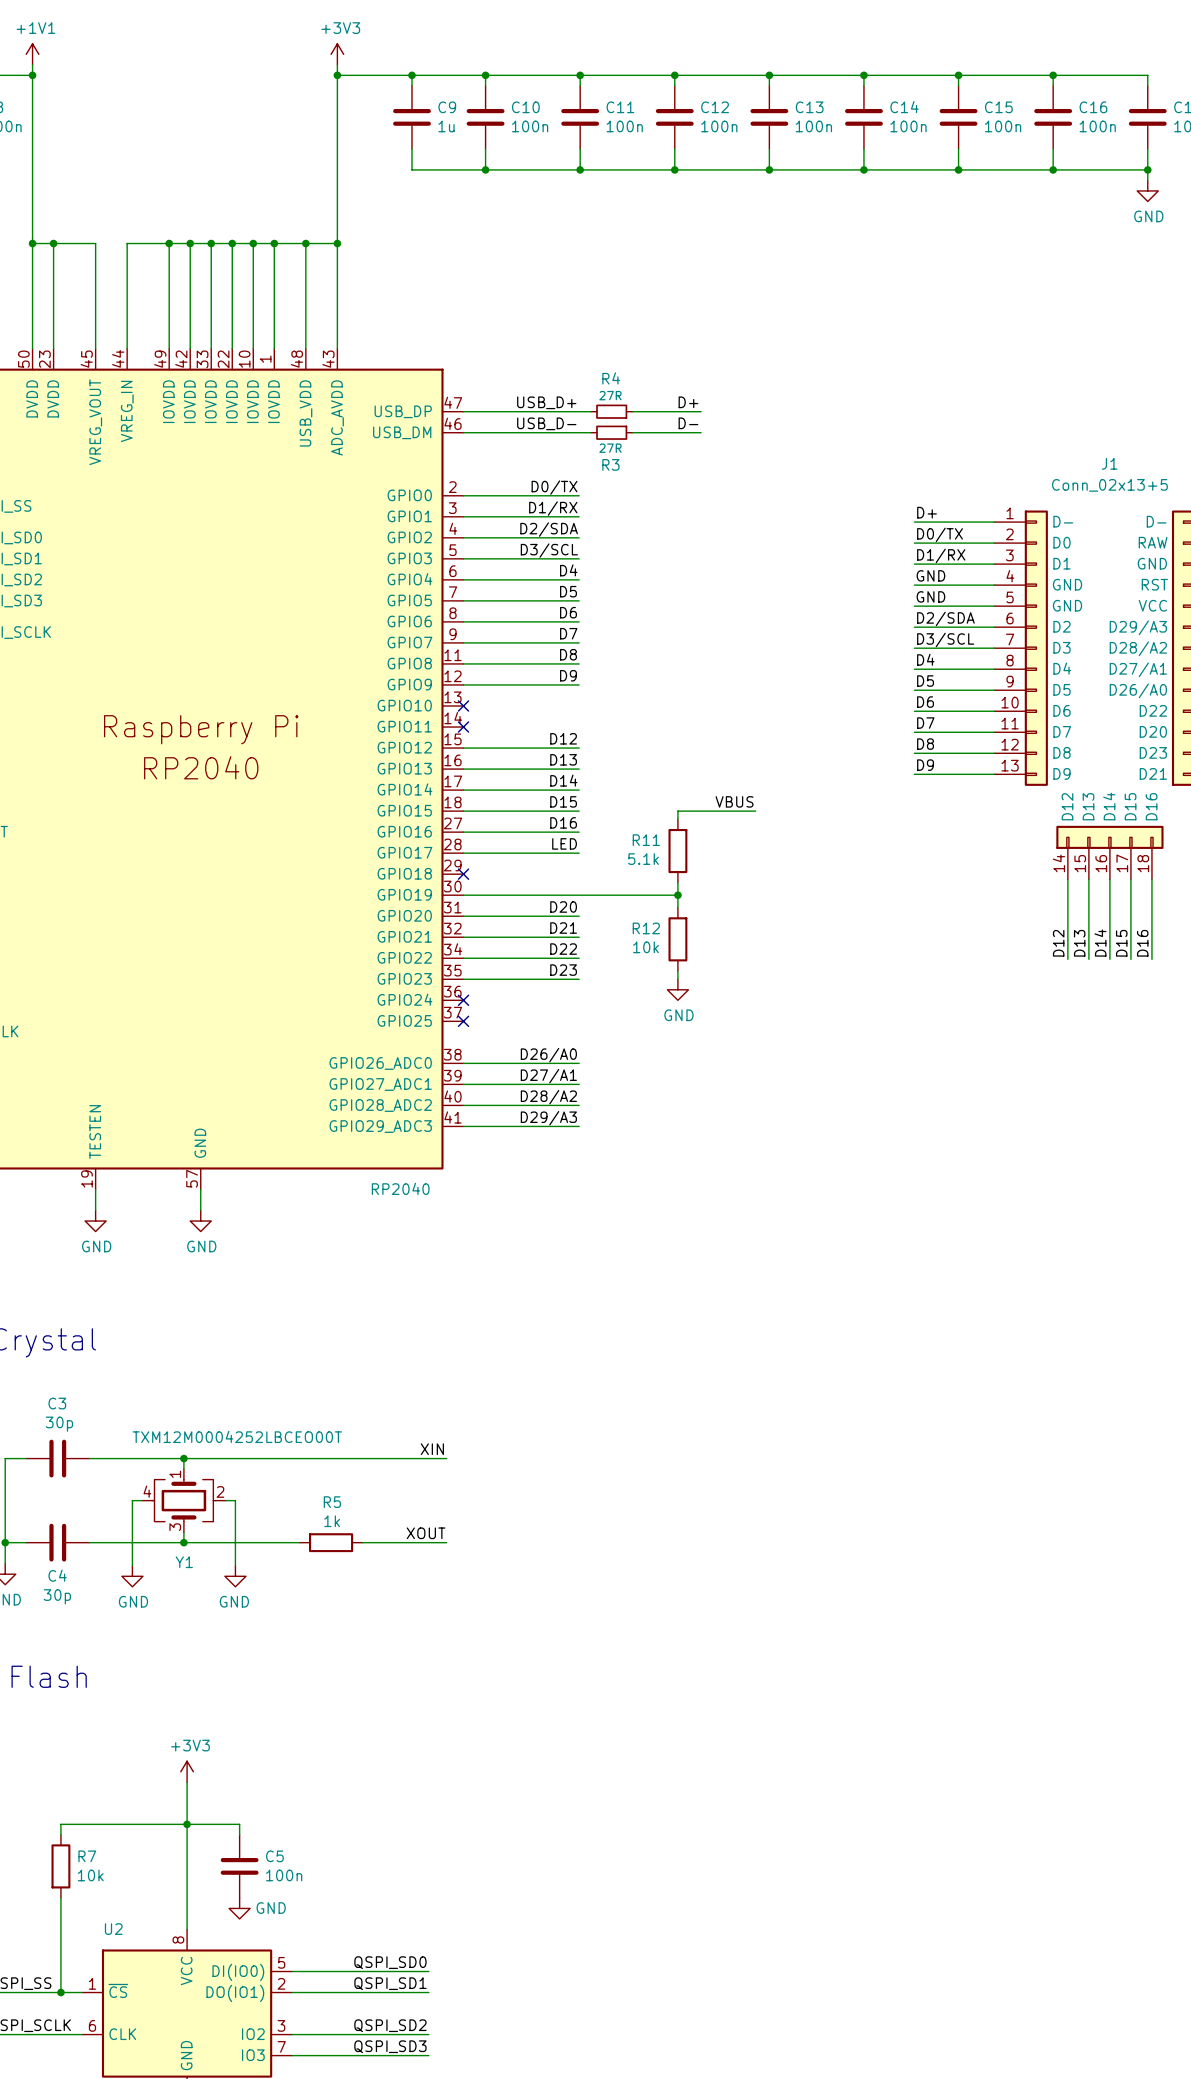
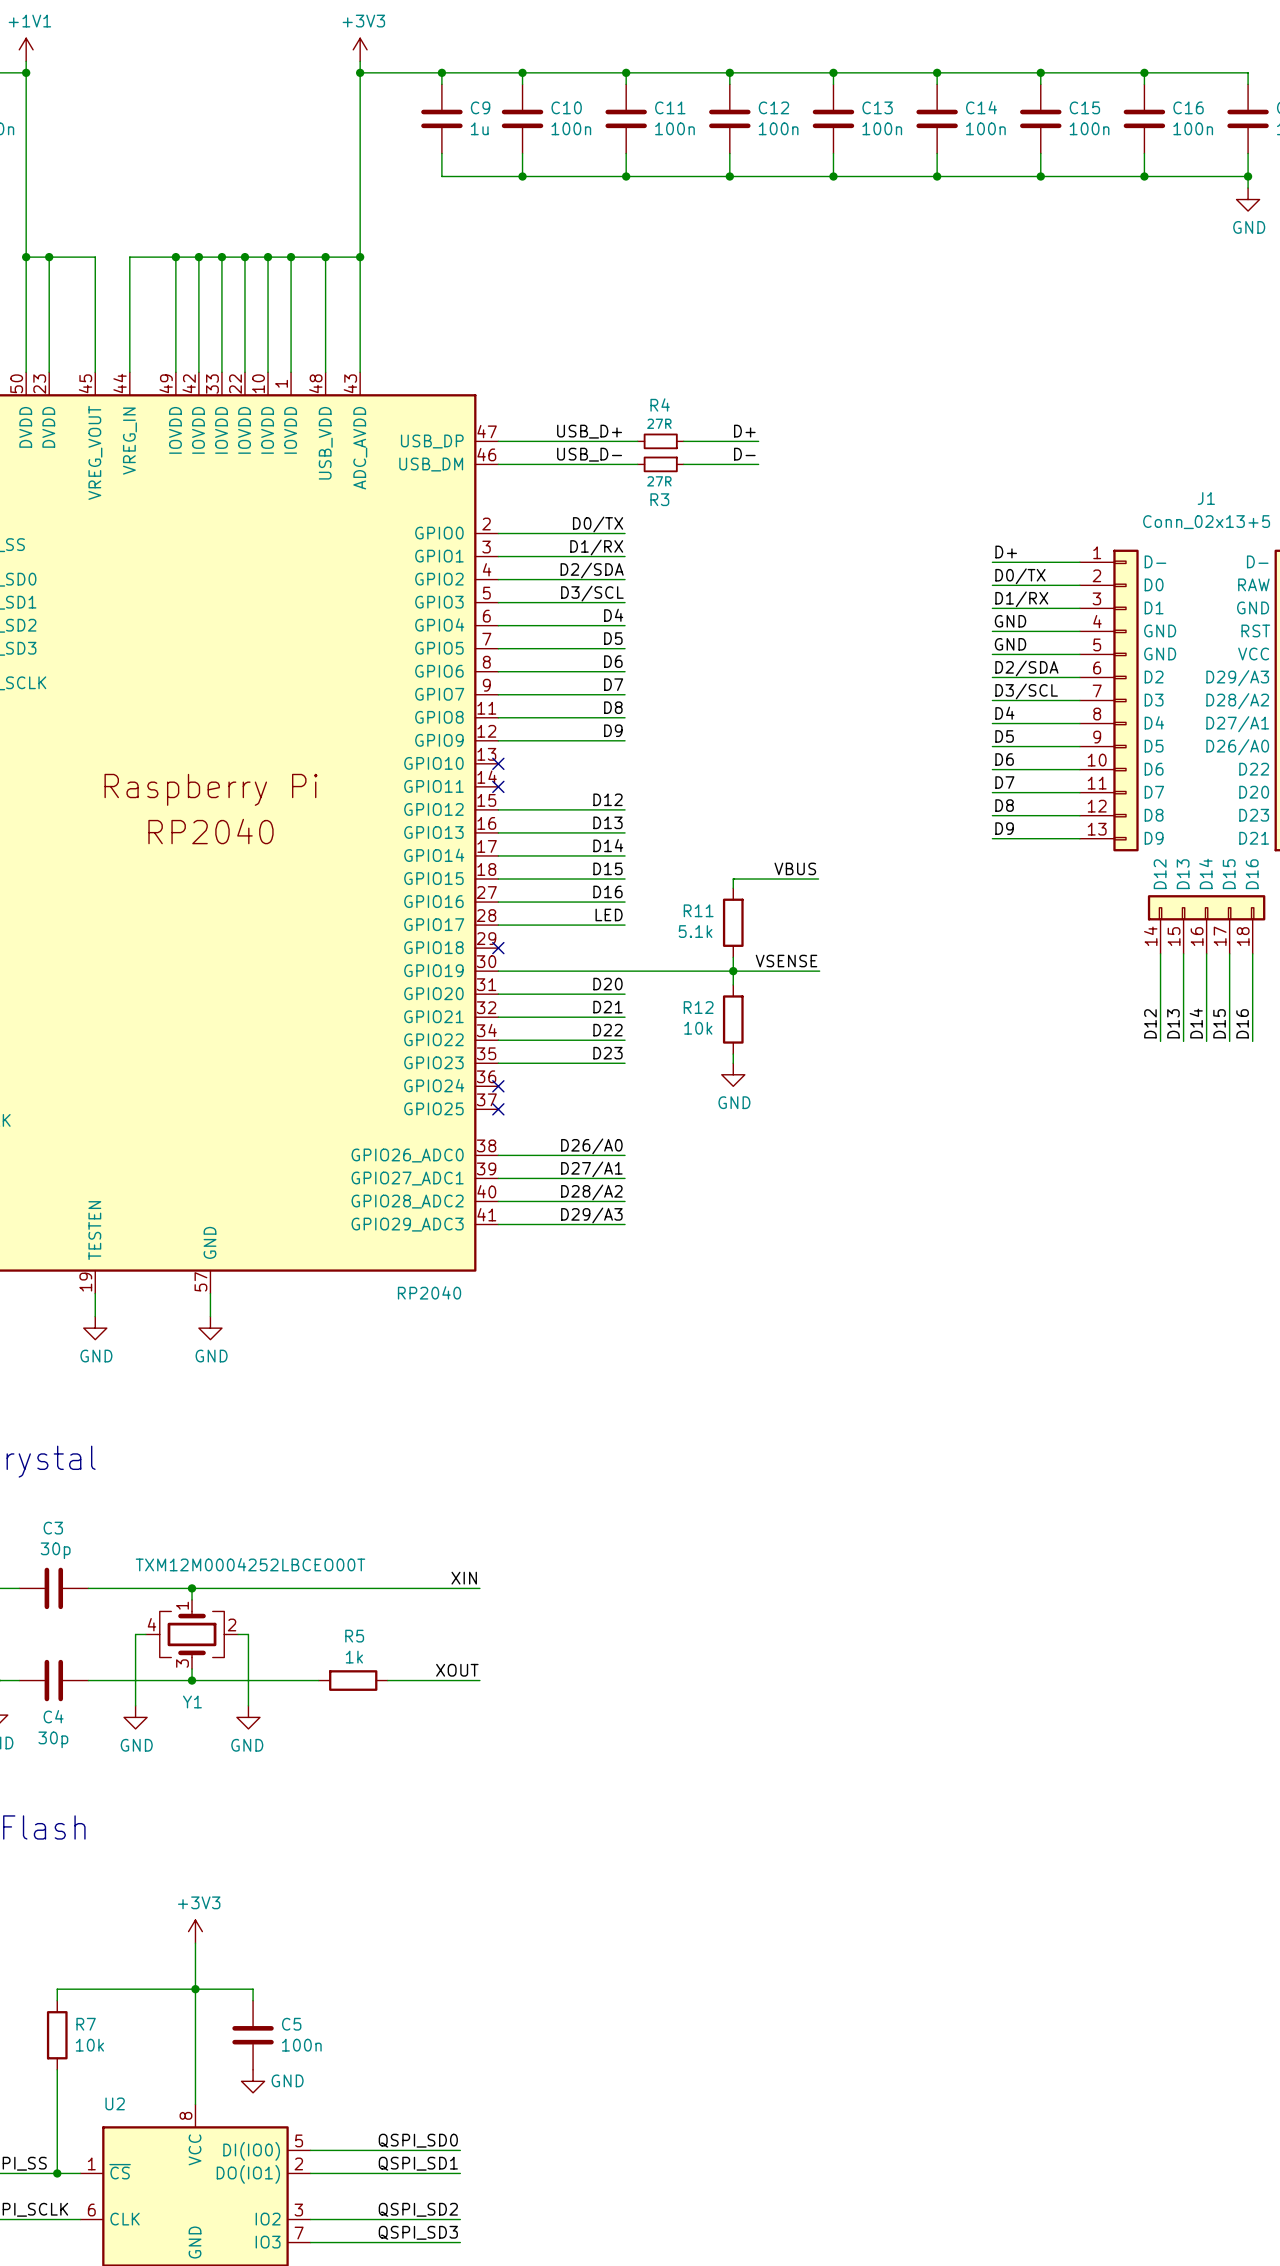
label: none -> VSENSE (786, 961)
wire: none -> (733, 971) (819, 971)

